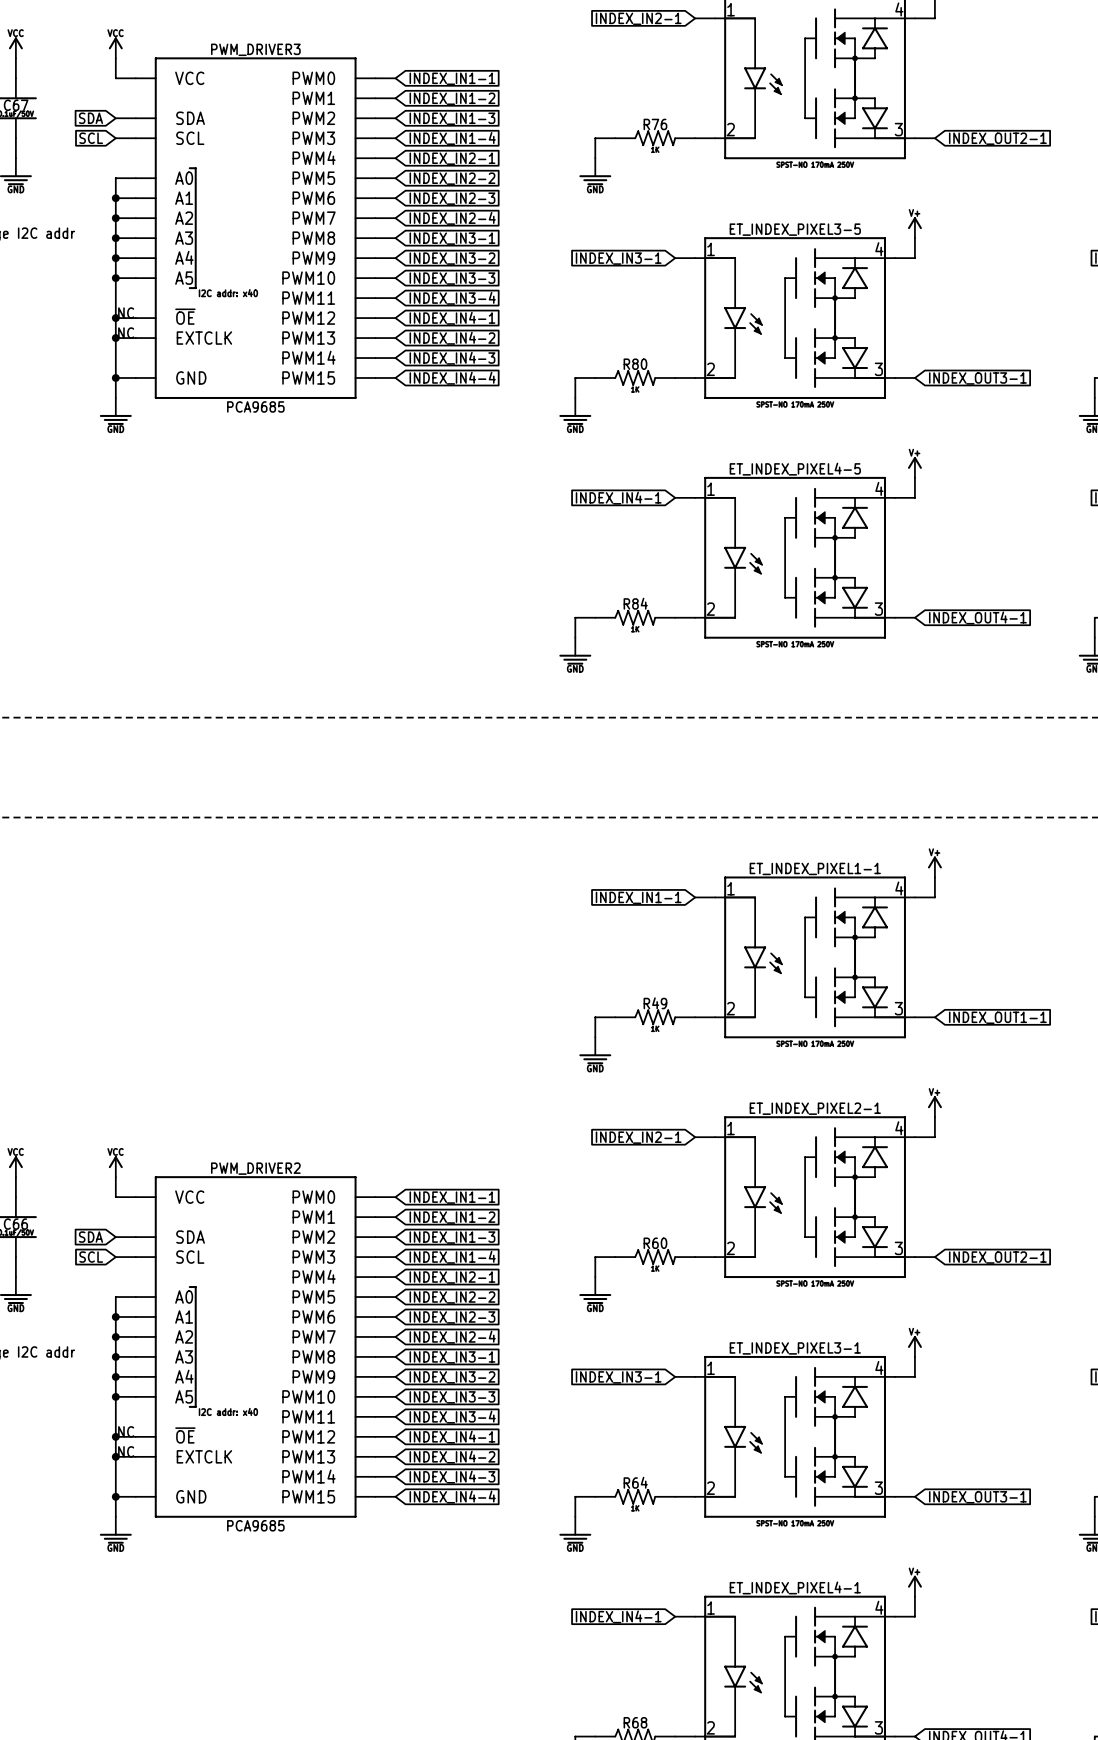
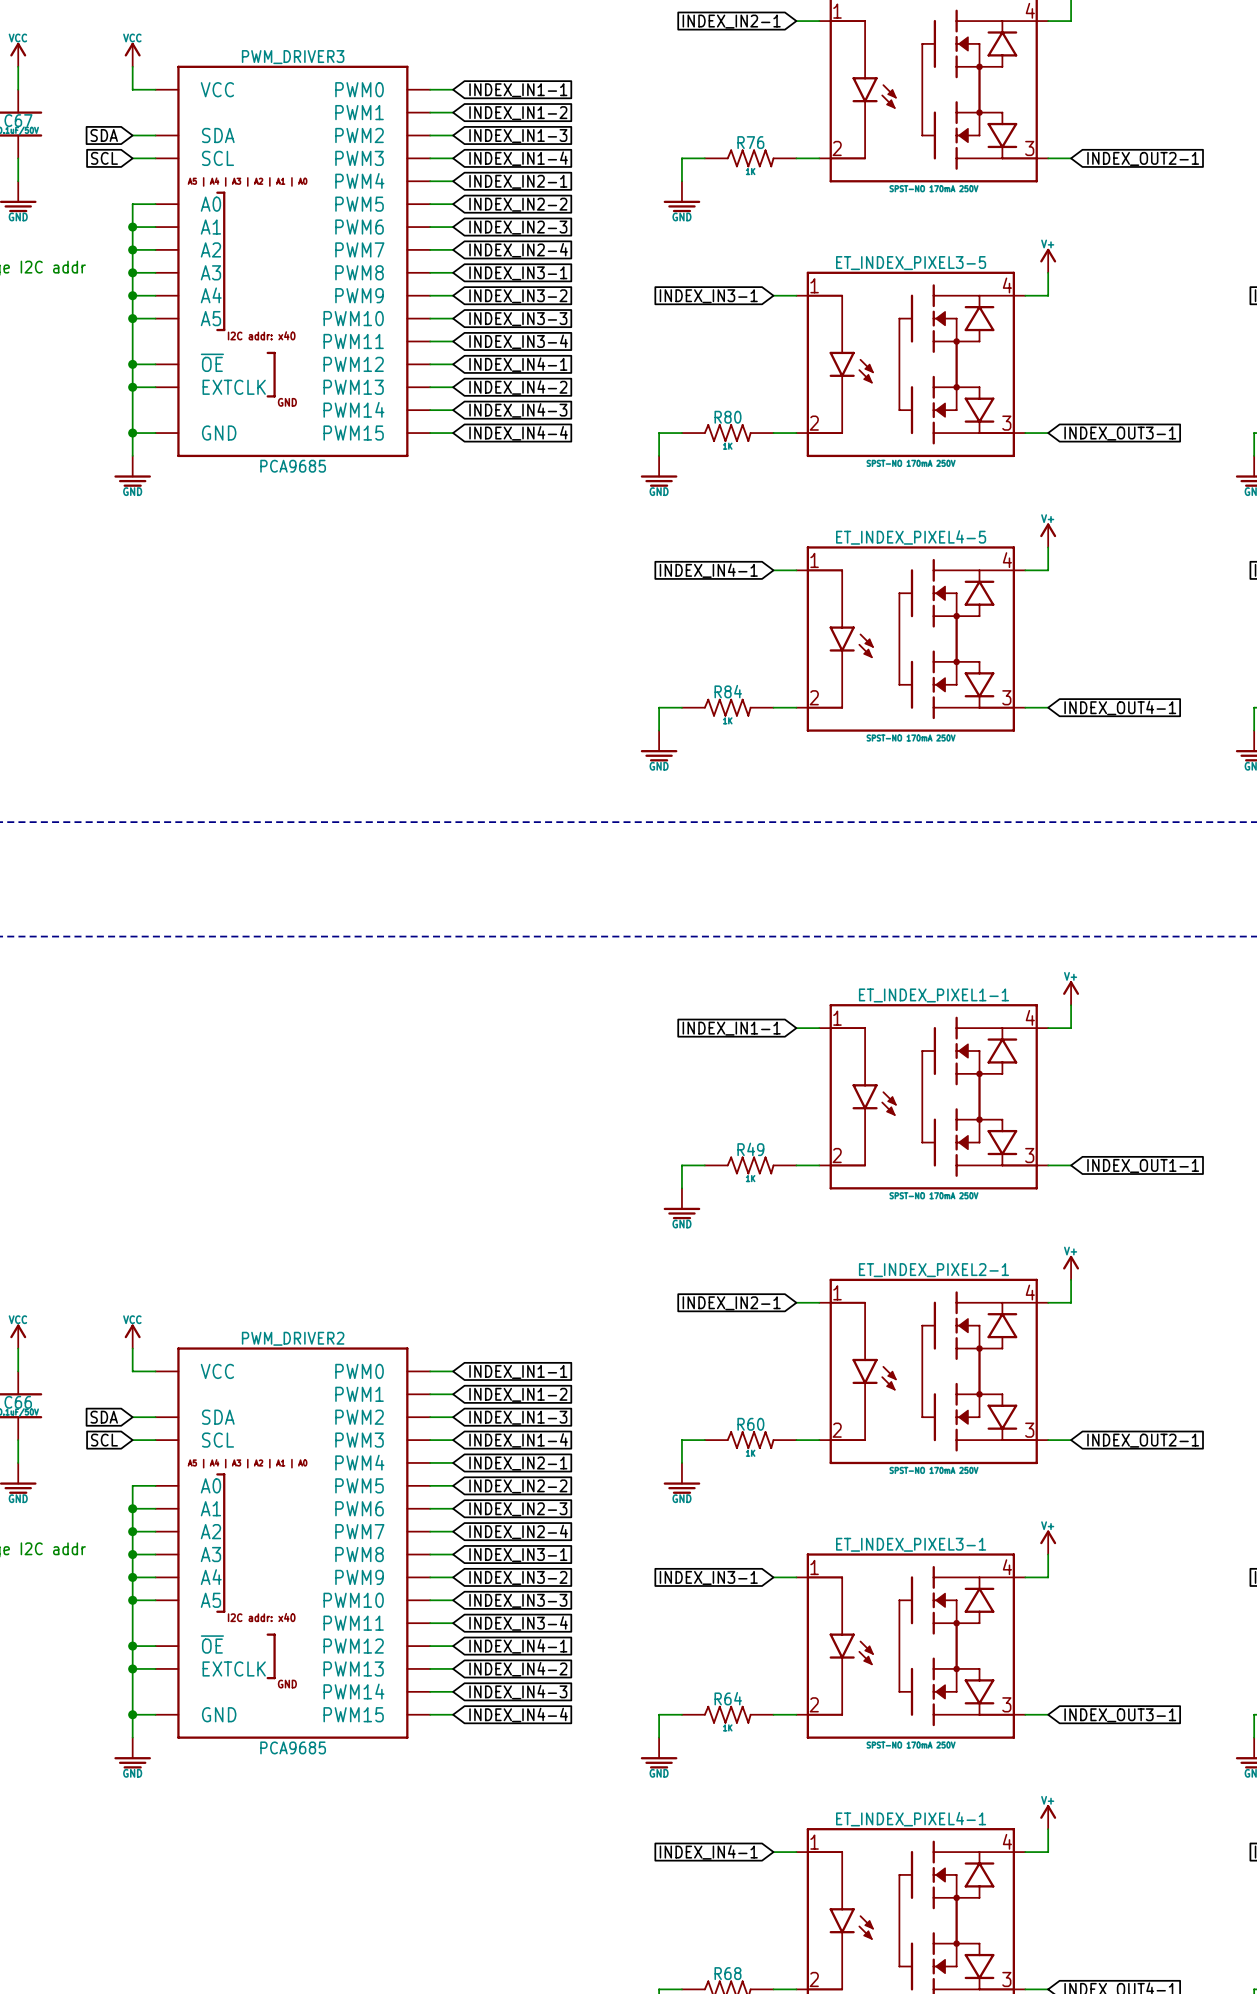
PWM_DRIVER3 symbol: [135, 57, 376, 399] -> [155, 65, 431, 458]
PWM_DRIVER2 symbol: [135, 1176, 376, 1518] -> [155, 1347, 431, 1739]

